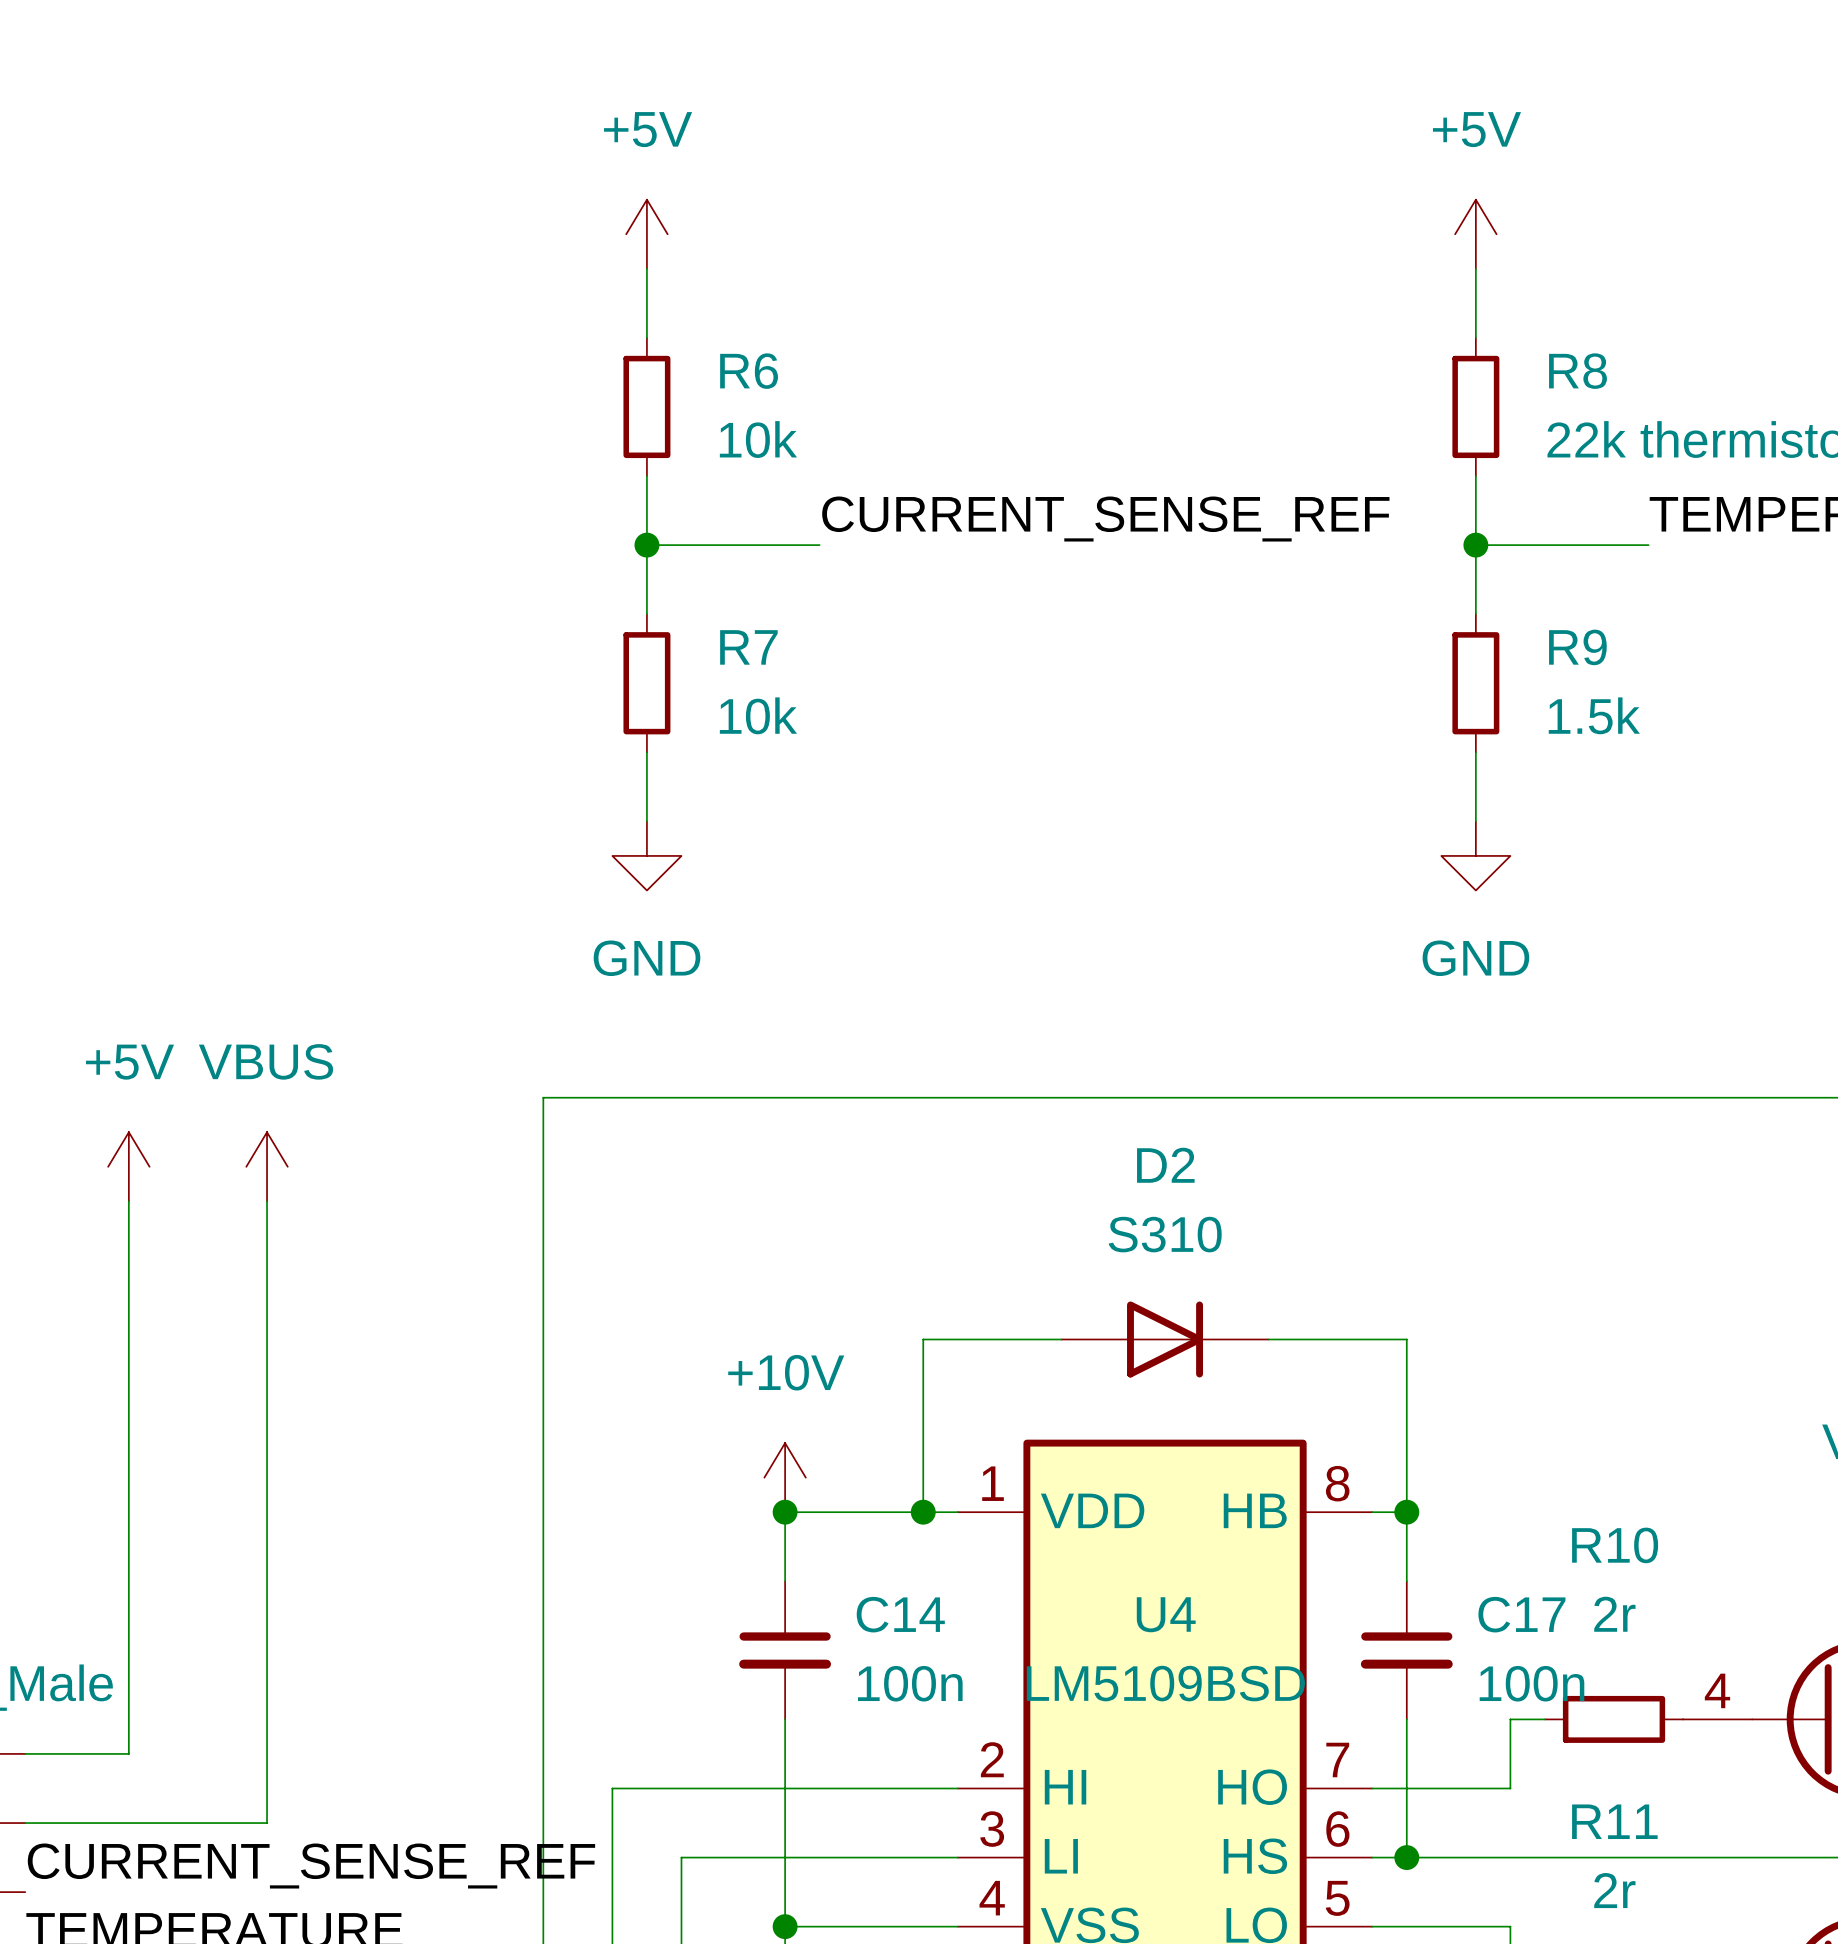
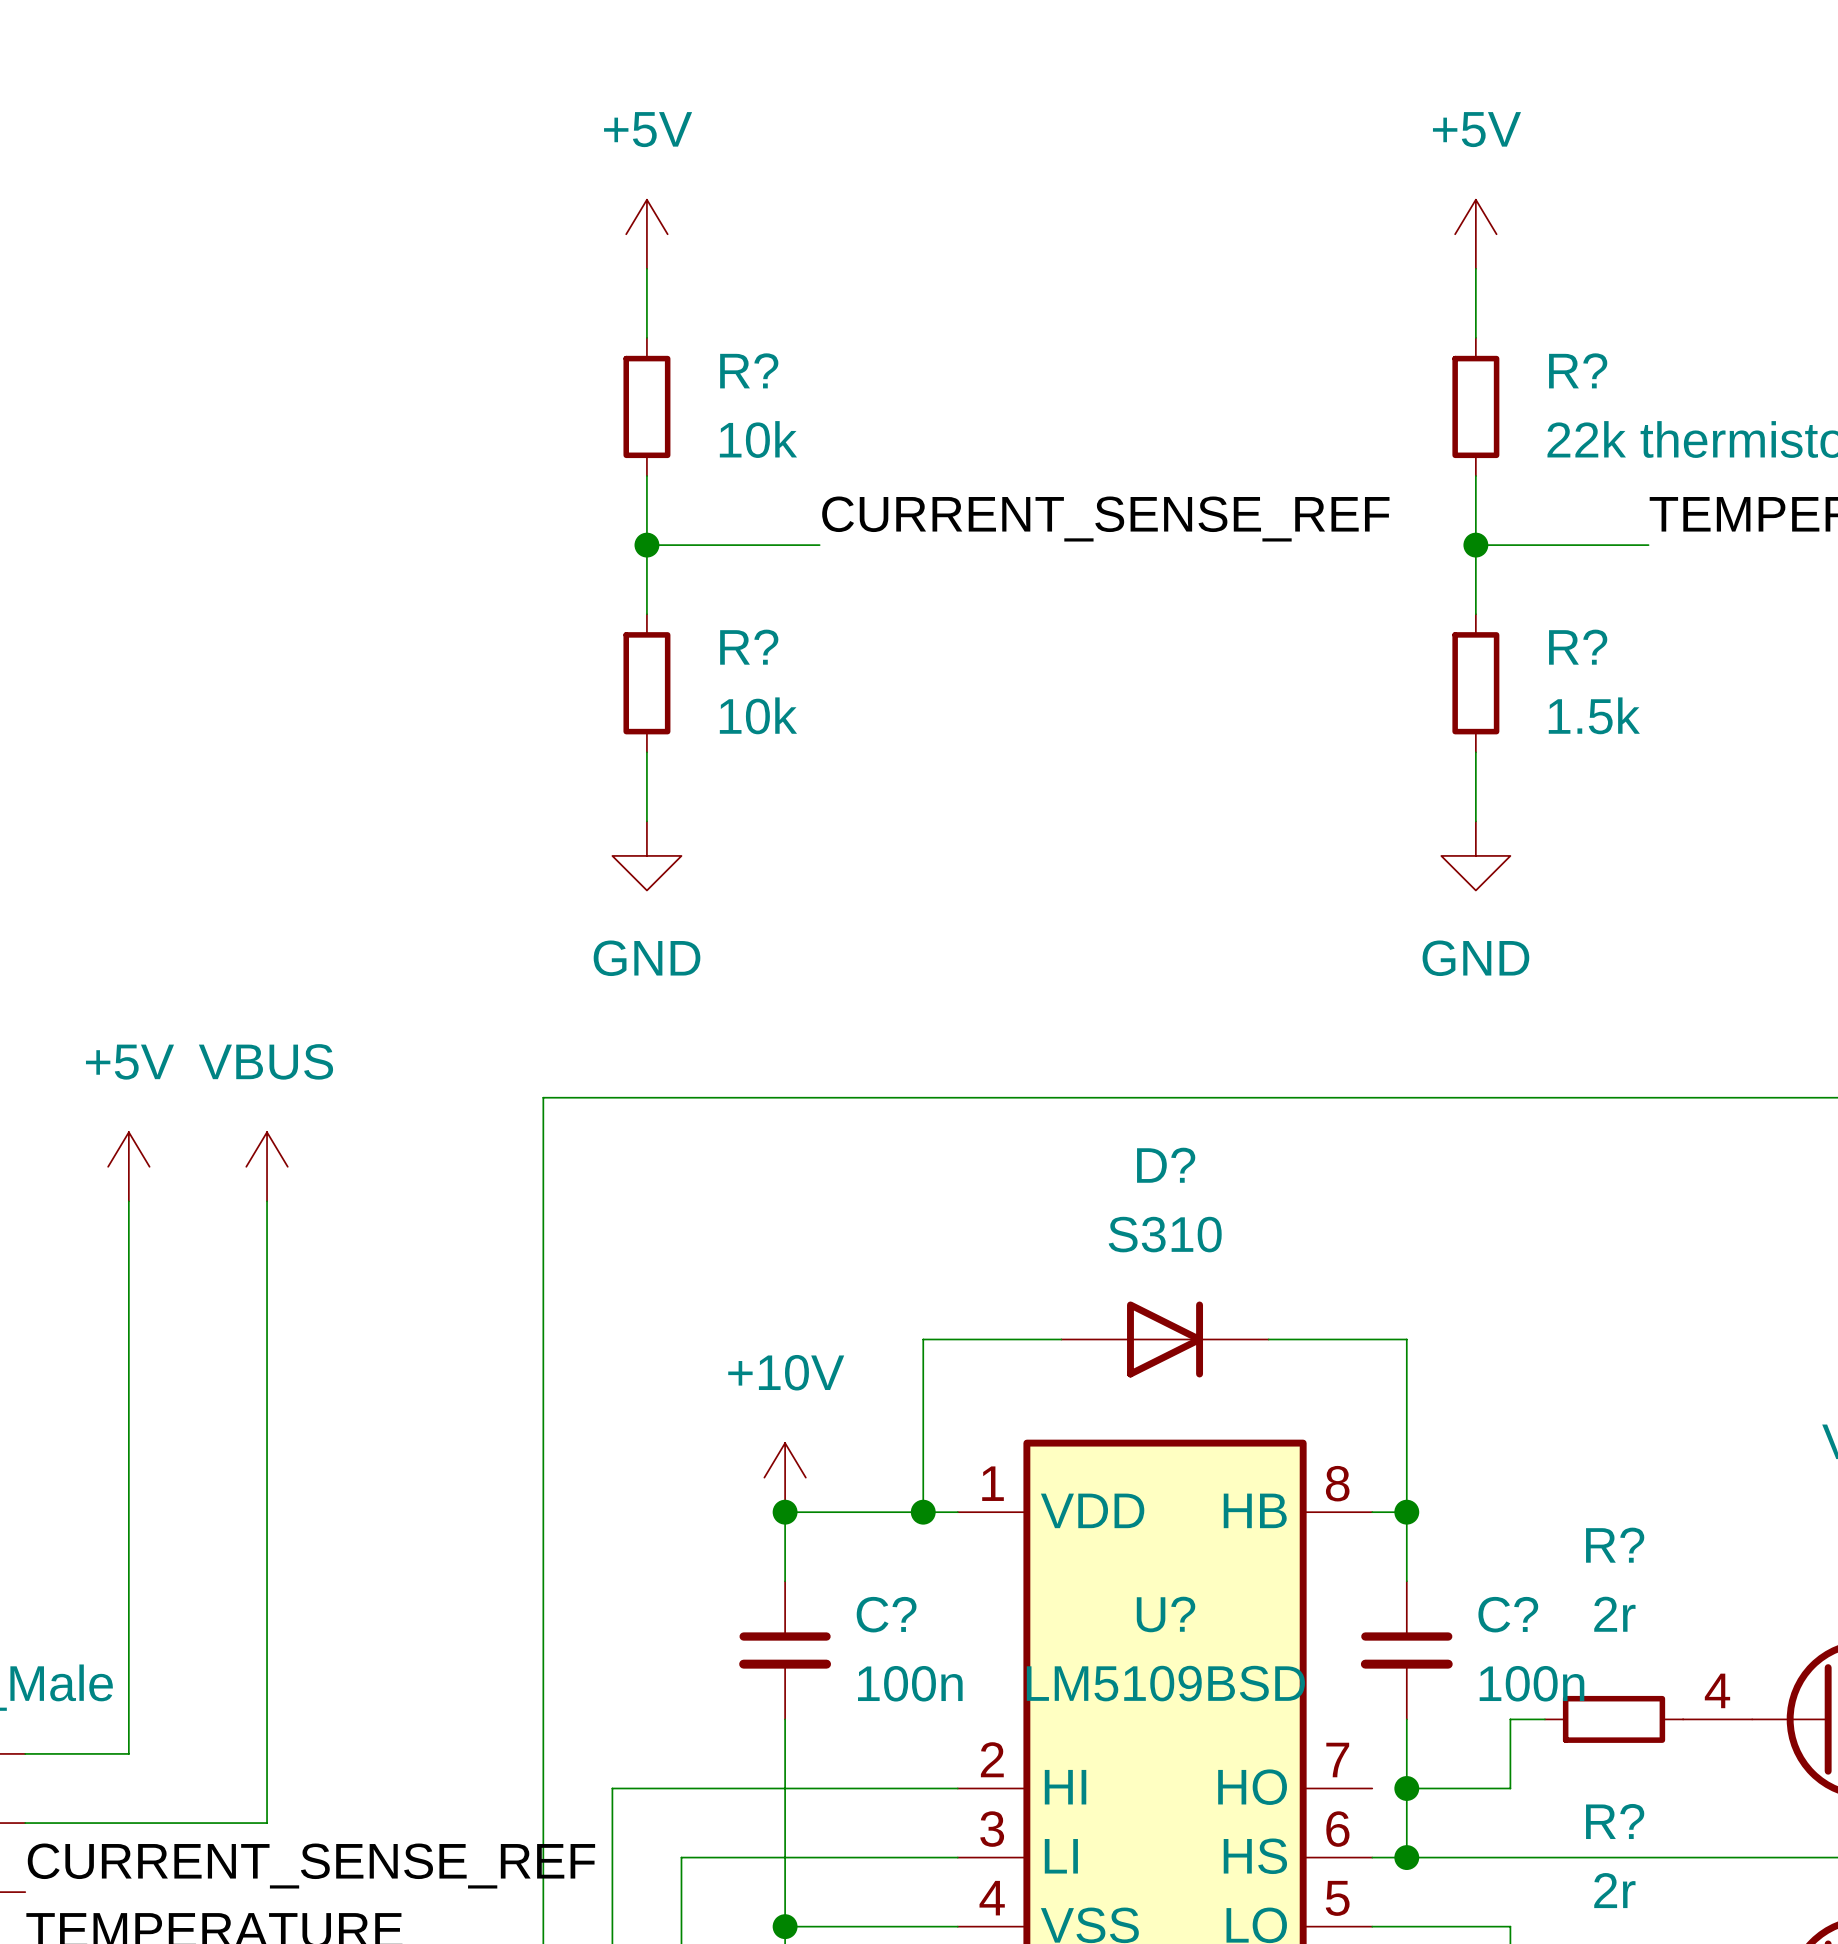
R6 name: R6 (749, 371) -> R? (749, 370)
R8 name: R8 (1578, 371) -> R? (1578, 370)
R7 name: R7 (748, 647) -> R? (749, 647)
R9 name: R9 (1577, 647) -> R? (1578, 647)
D2 name: D2 (1165, 1165) -> D? (1166, 1165)
R10 name: R10 (1615, 1545) -> R? (1615, 1545)
C14 name: C14 (900, 1614) -> C? (886, 1614)
U4 name: U4 (1166, 1614) -> U? (1166, 1614)
C17 name: C17 (1521, 1614) -> C? (1508, 1614)
wire: (1372, 1788) (1406, 1788) -> none
junction: none -> (1406, 1788)
R11 name: R11 (1614, 1821) -> R? (1615, 1821)

